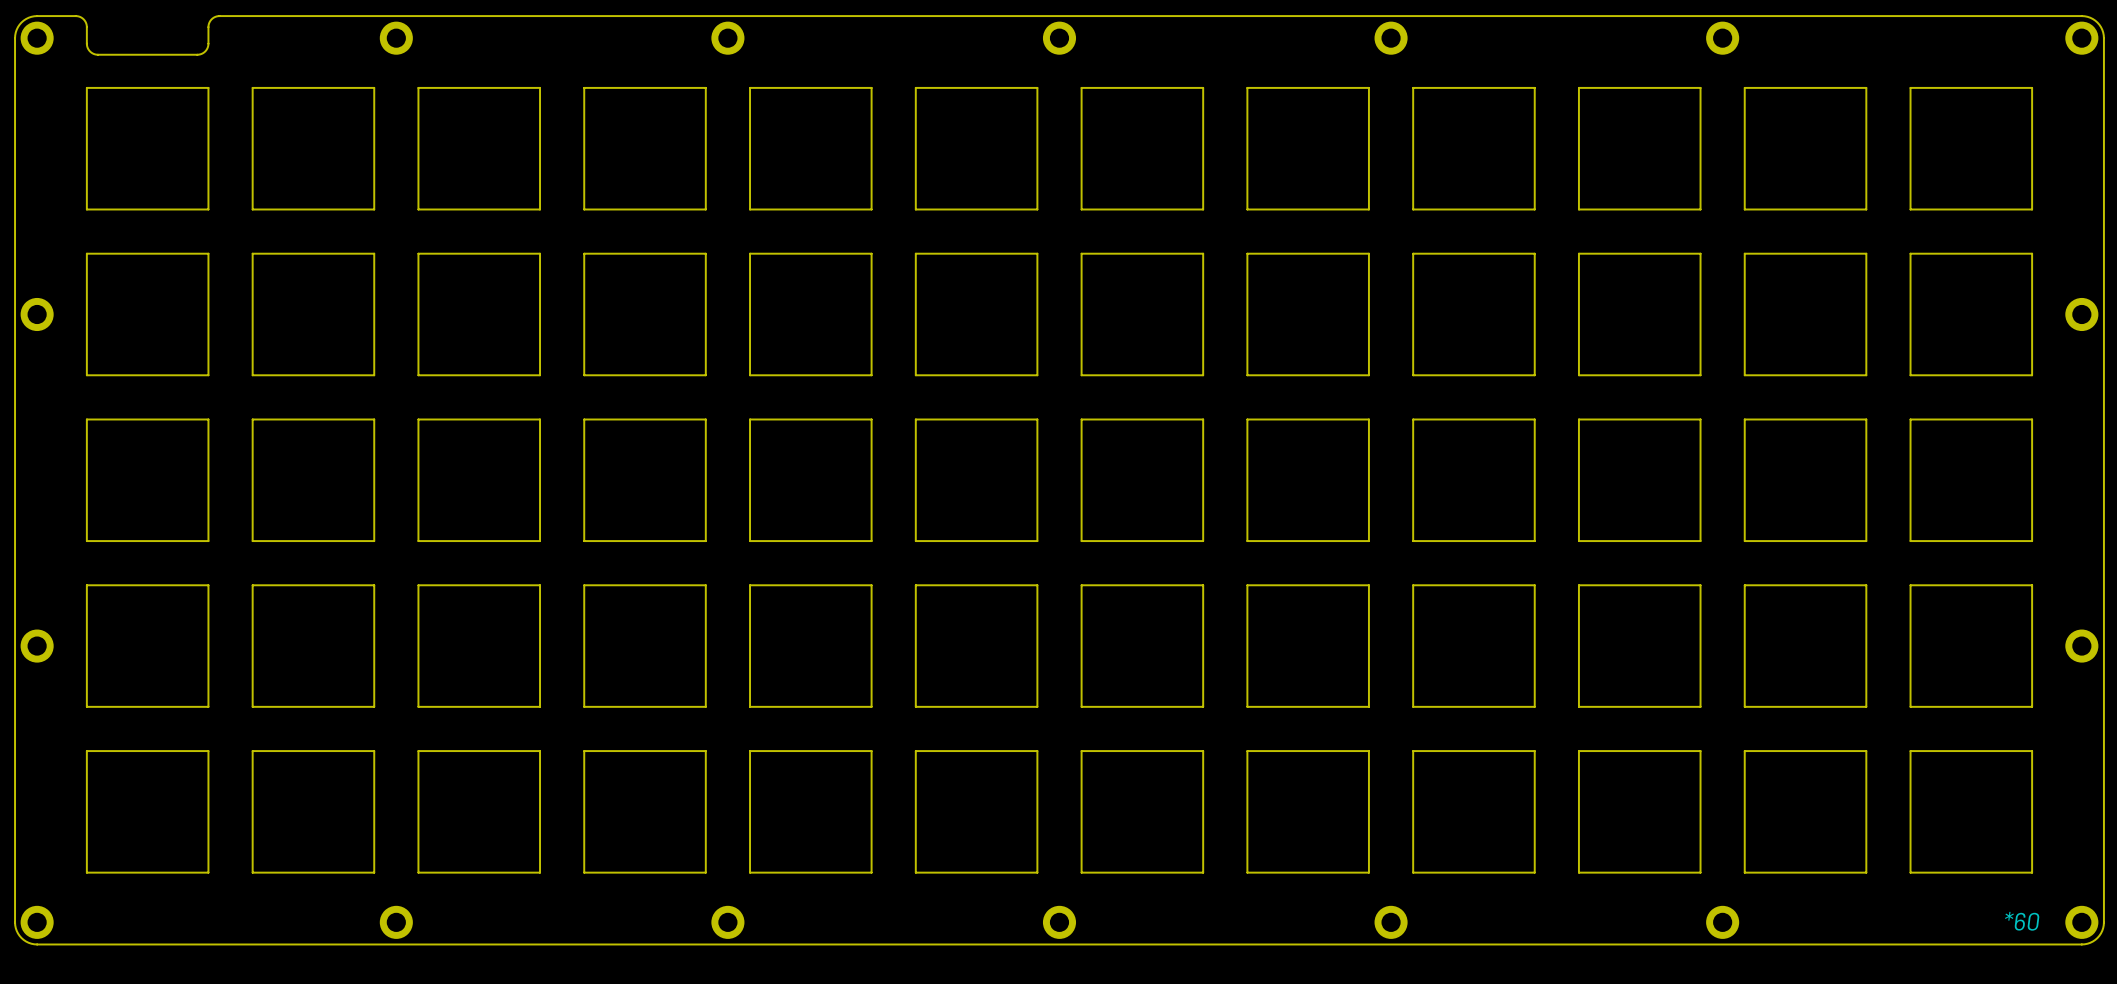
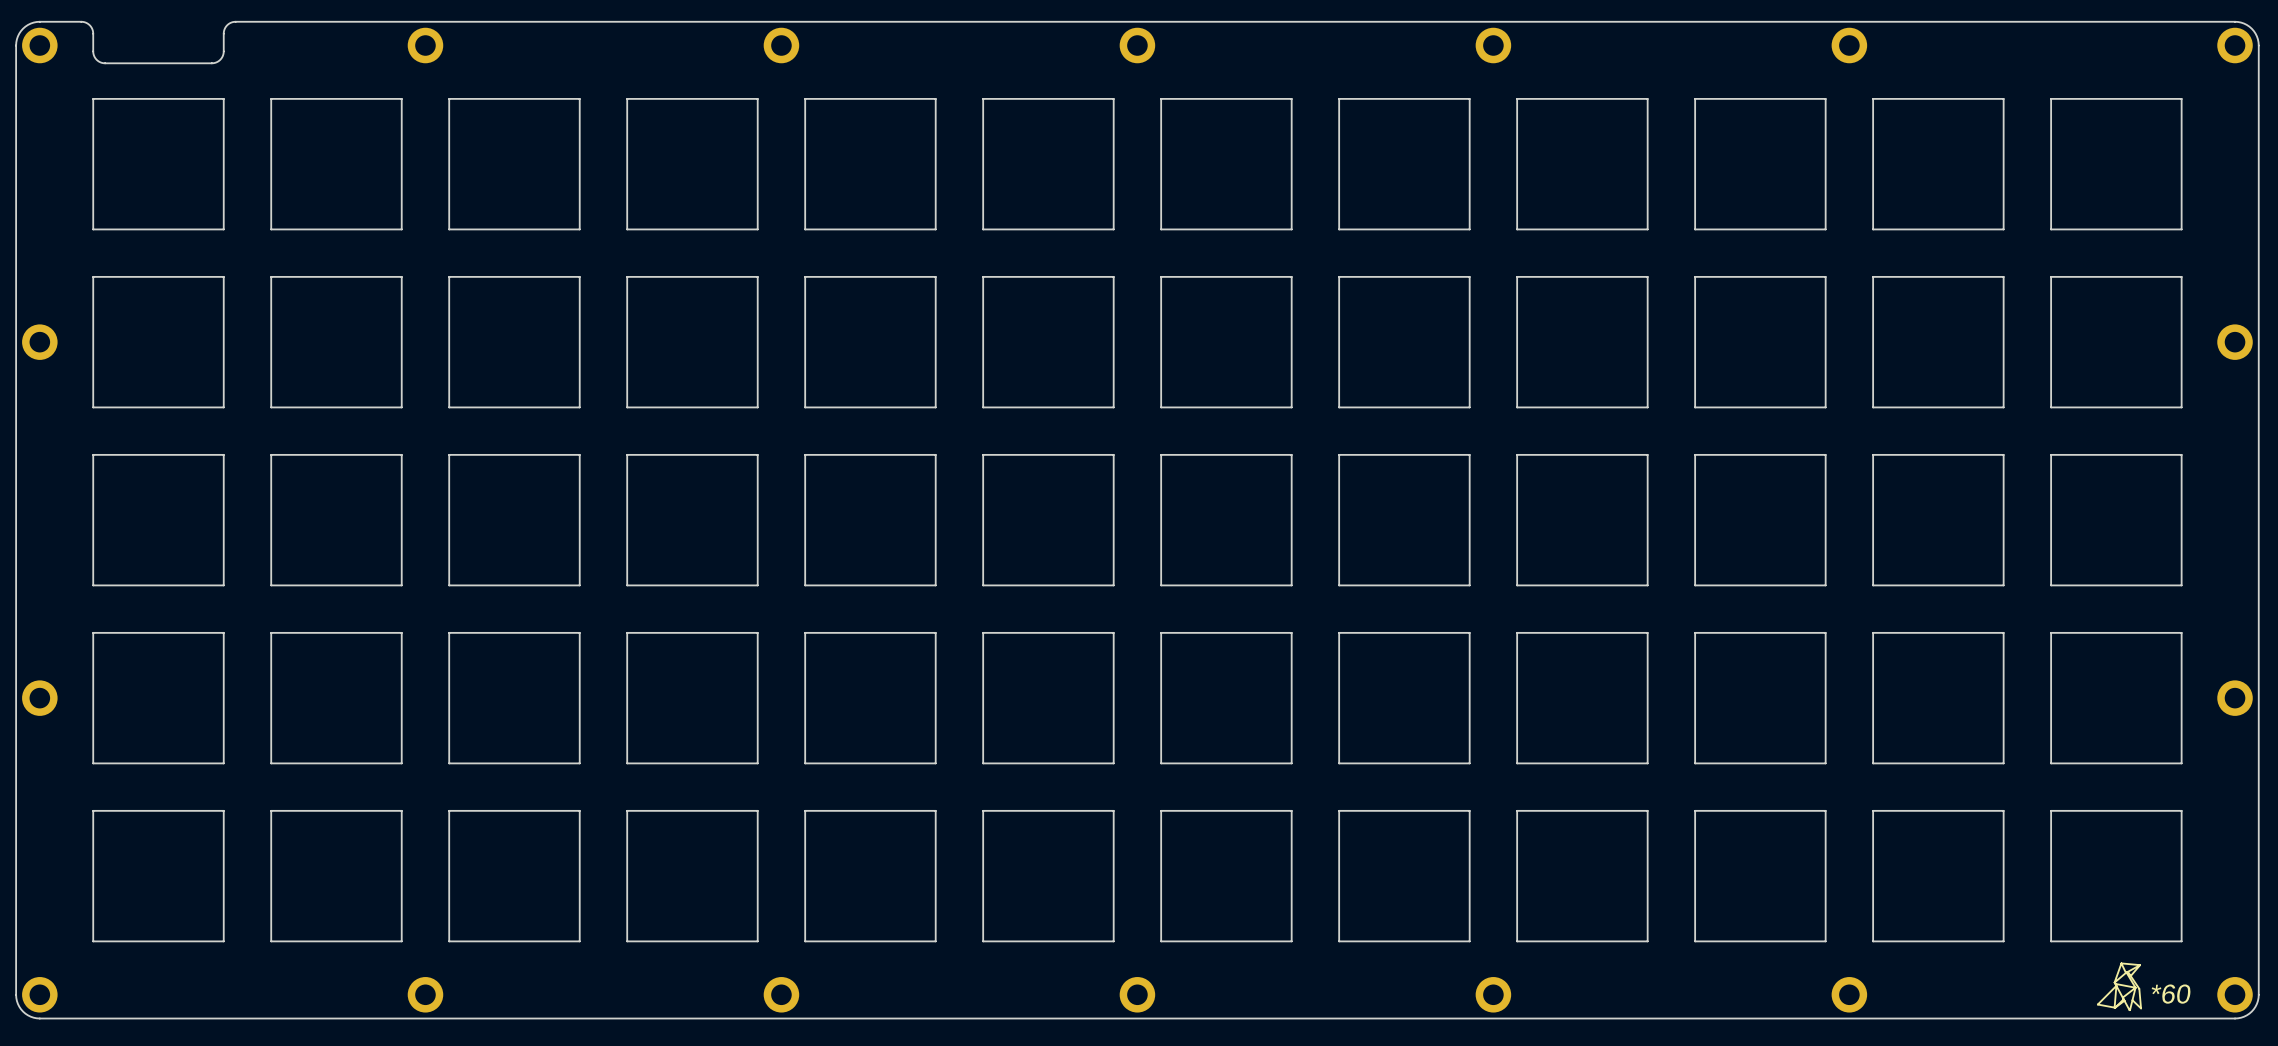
drawing: none -> [2097, 962, 2142, 1011]

